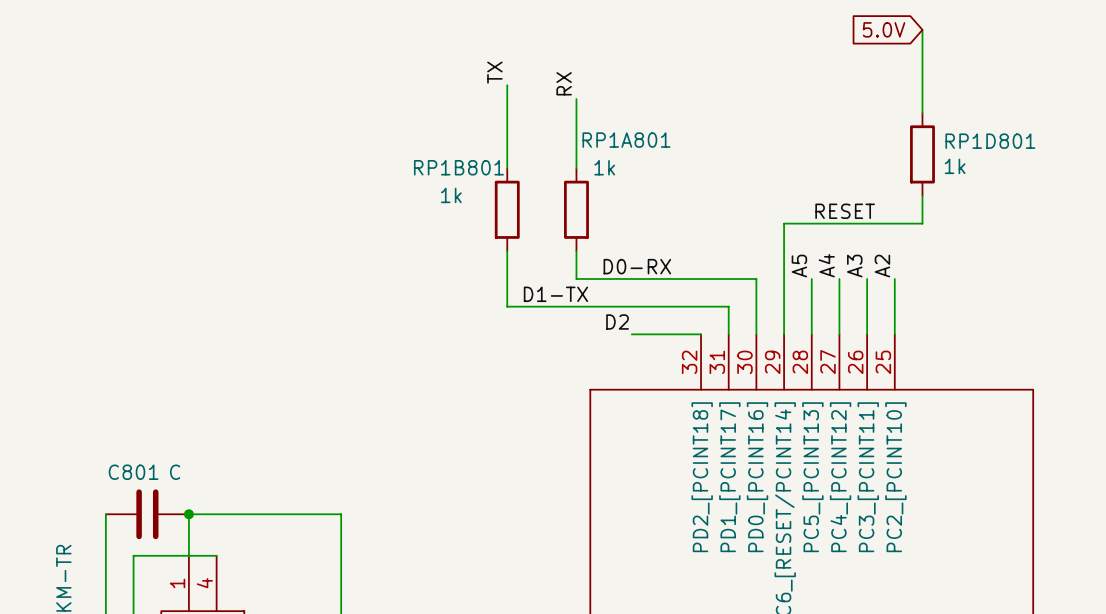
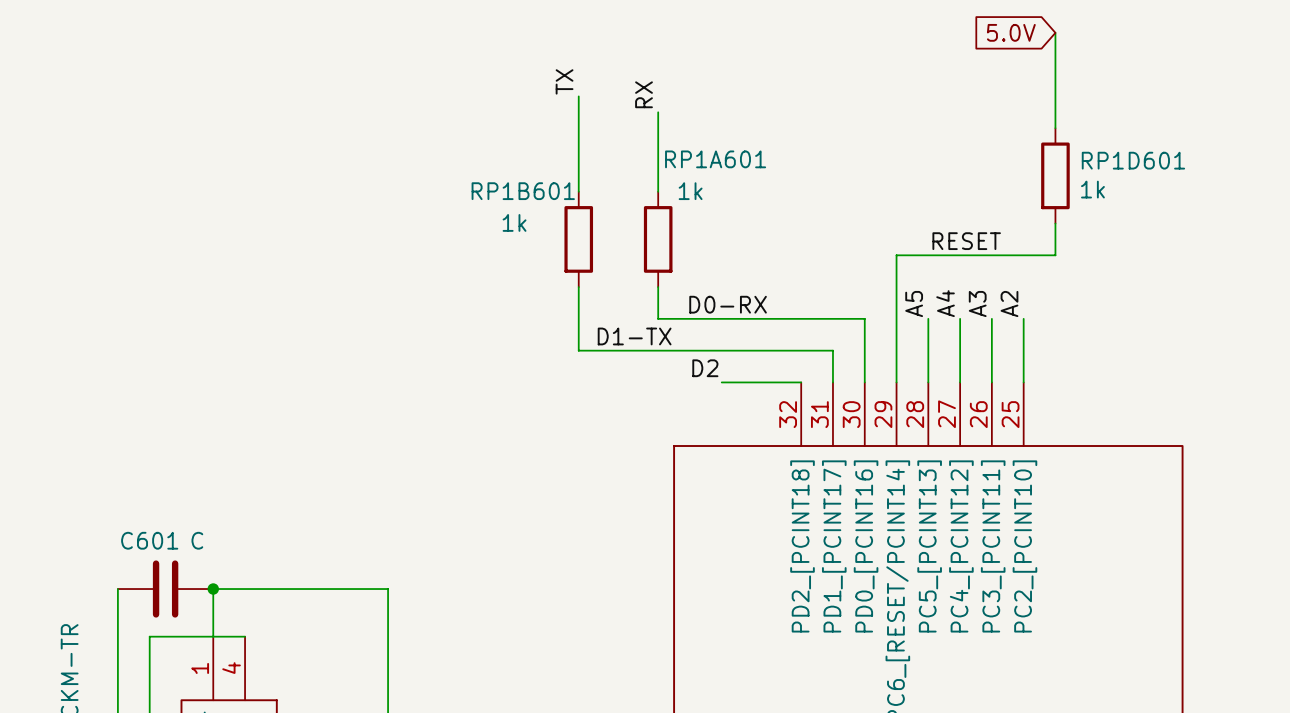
RP1A801 name: RP1A801 (626, 140) -> RP1A601 (715, 159)
RP1D801 name: RP1D801 (990, 141) -> RP1D601 (1133, 160)
RP1B801 name: RP1B801 (458, 167) -> RP1B601 (523, 191)
C801 name: C801 (133, 472) -> C601 (149, 540)

